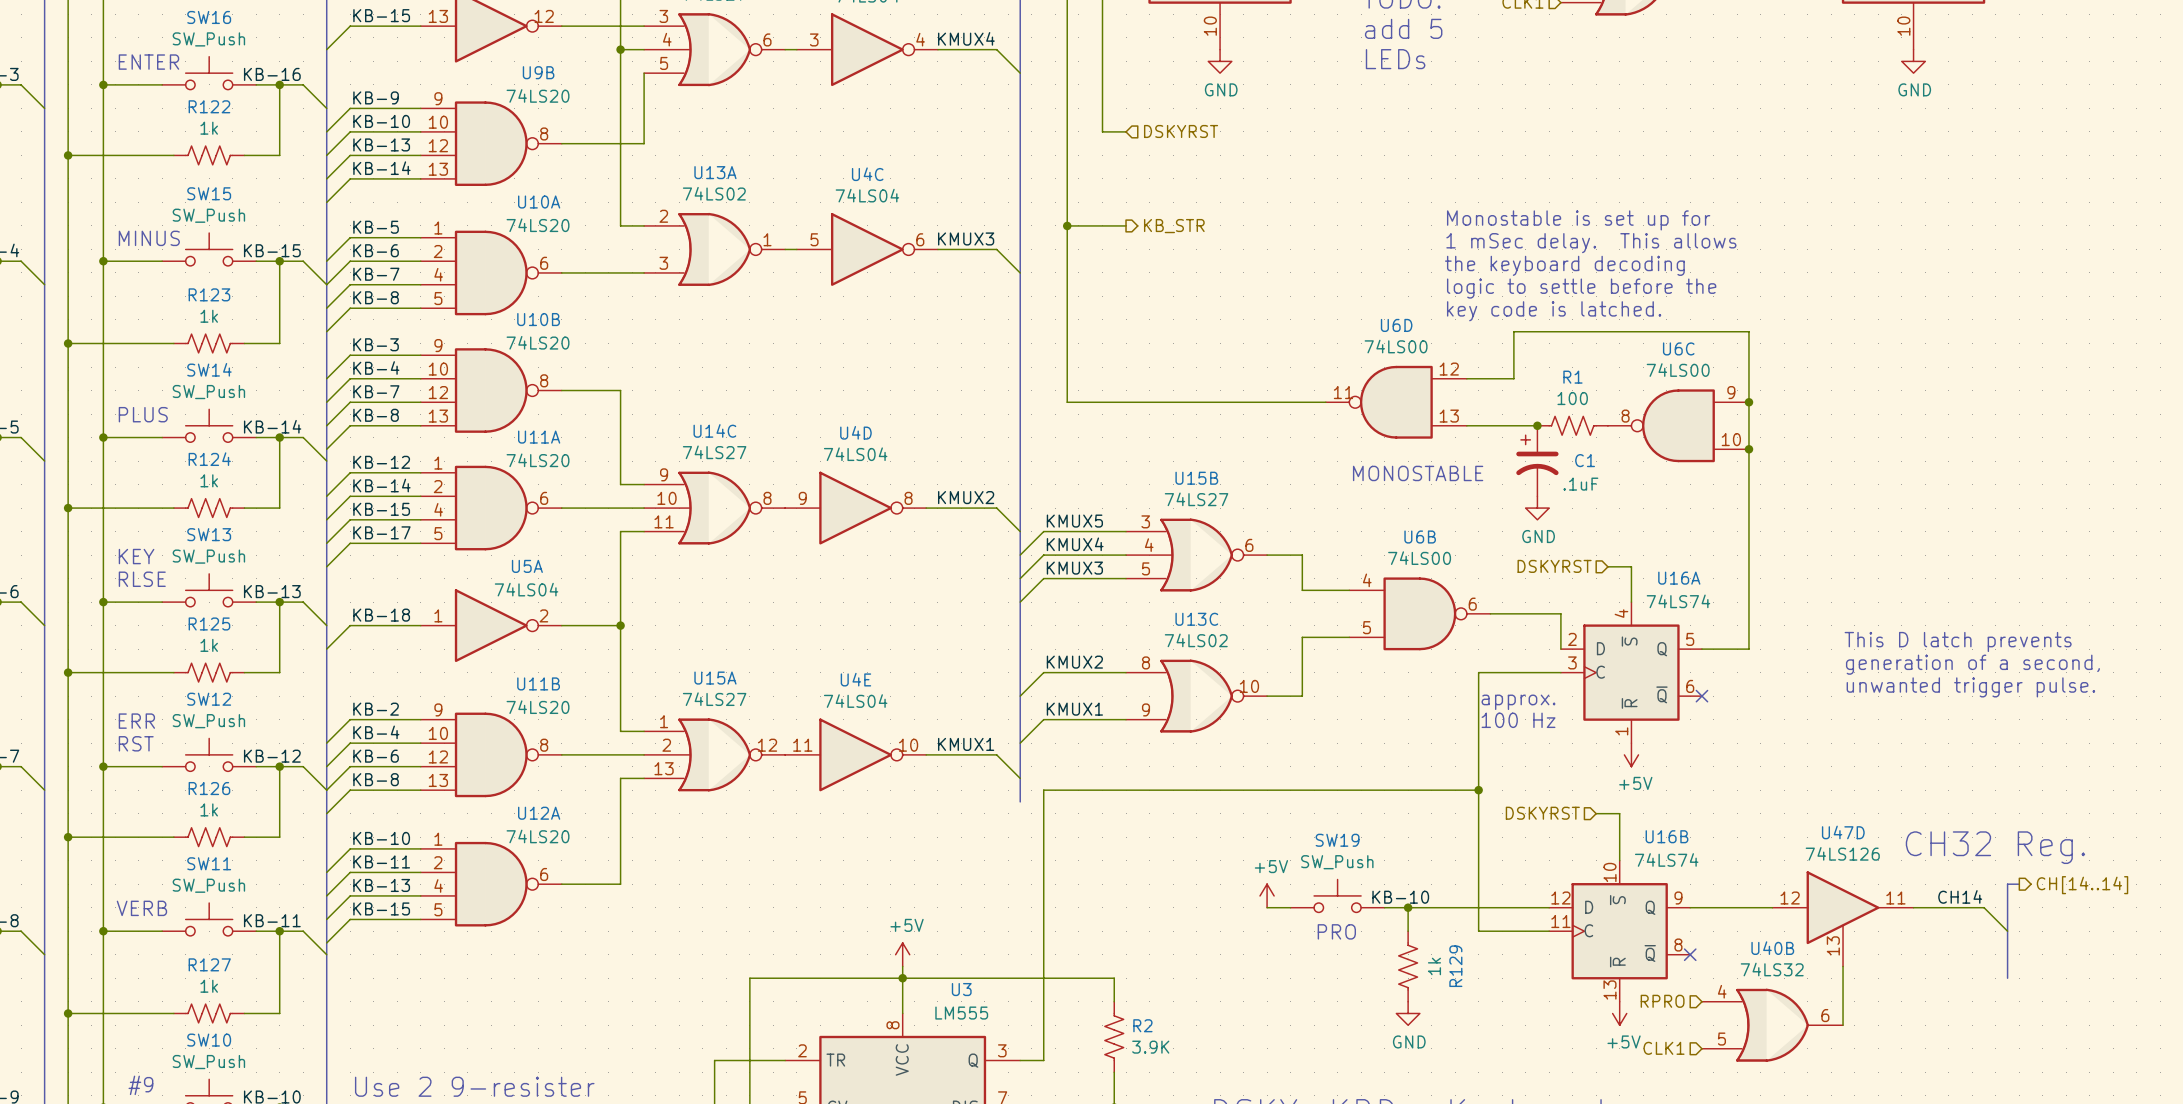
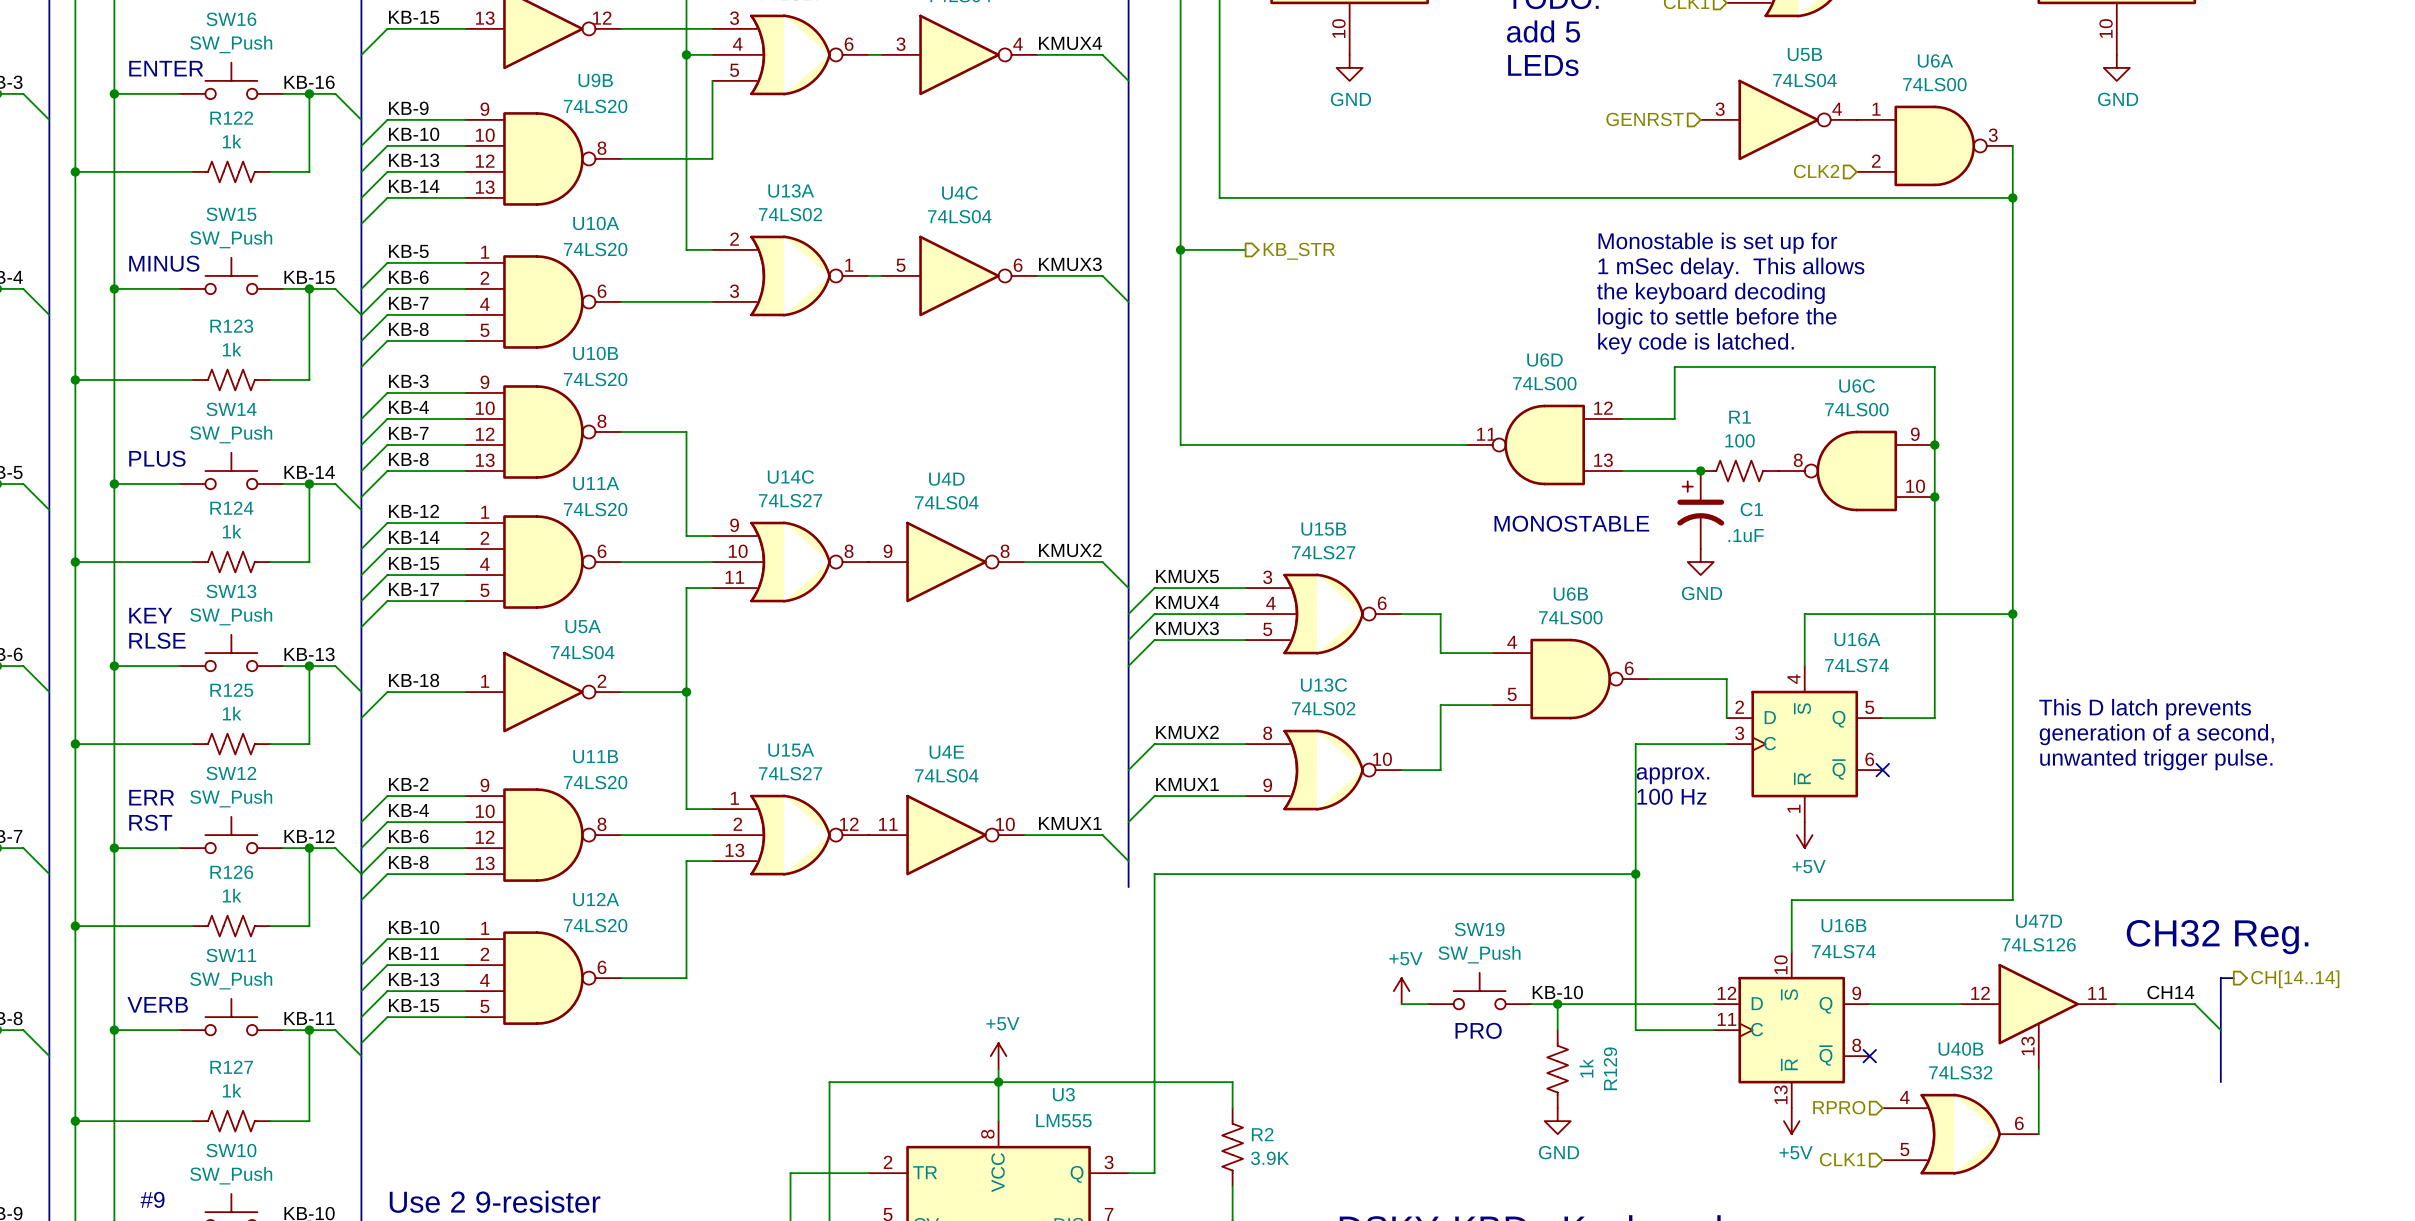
hierarchical label: none -> GENRST (1645, 119)
U5B: none -> 74LS04 (1778, 119)
wire: (1102, 131) (1126, 131) -> (1219, 145) (1219, 197) (2012, 197)
hierarchical label: DSKYRST (1181, 131) -> none
U6A: none -> 74LS00 (1934, 145)
hierarchical label: none -> CLK2 (1816, 171)
junction: none -> (2012, 197)
junction: none -> (2012, 614)
hierarchical label: DSKYRST (1554, 566) -> none
wire: (1607, 566) (1631, 566) -> (2012, 614) (1804, 614) (1804, 627)
hierarchical label: DSKYRST (1542, 813) -> none
wire: (1596, 813) (1619, 813) -> (2012, 145) (2012, 900) (1791, 900)

